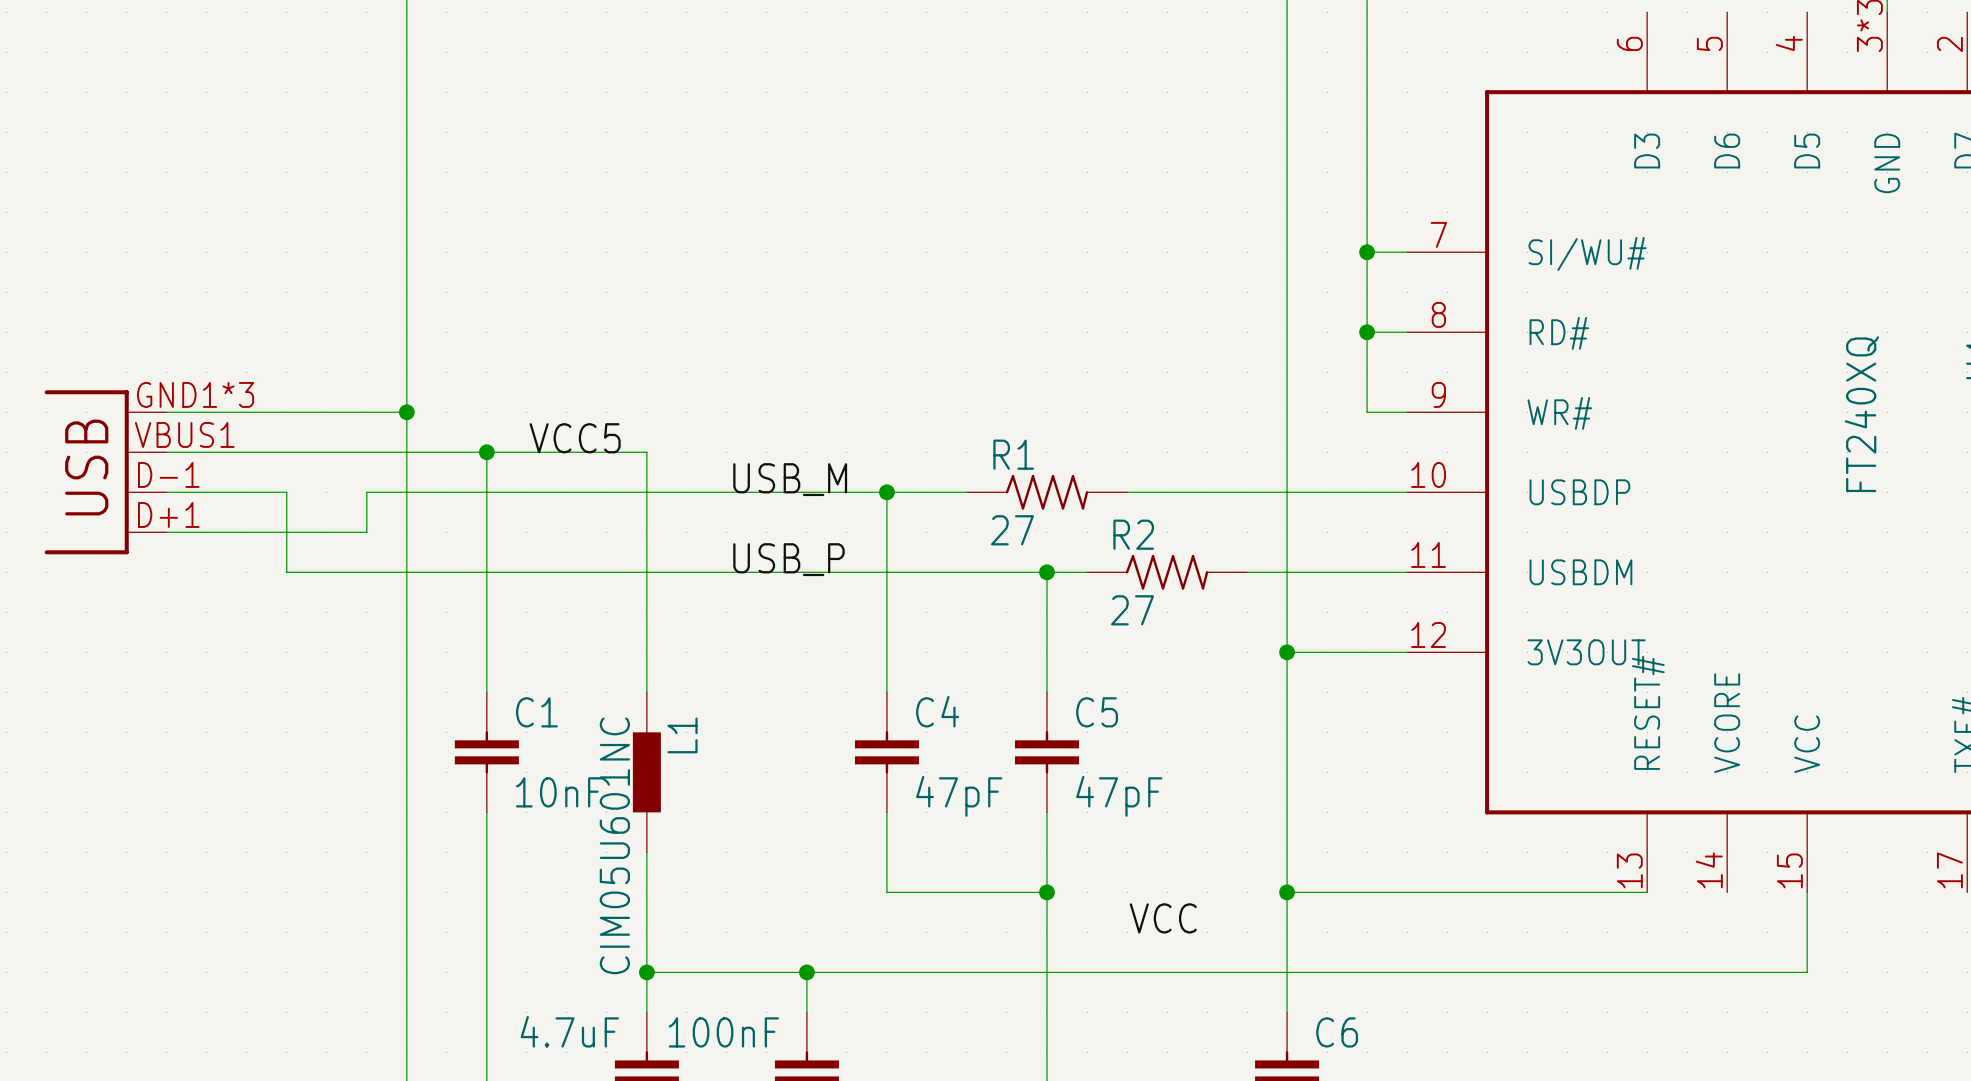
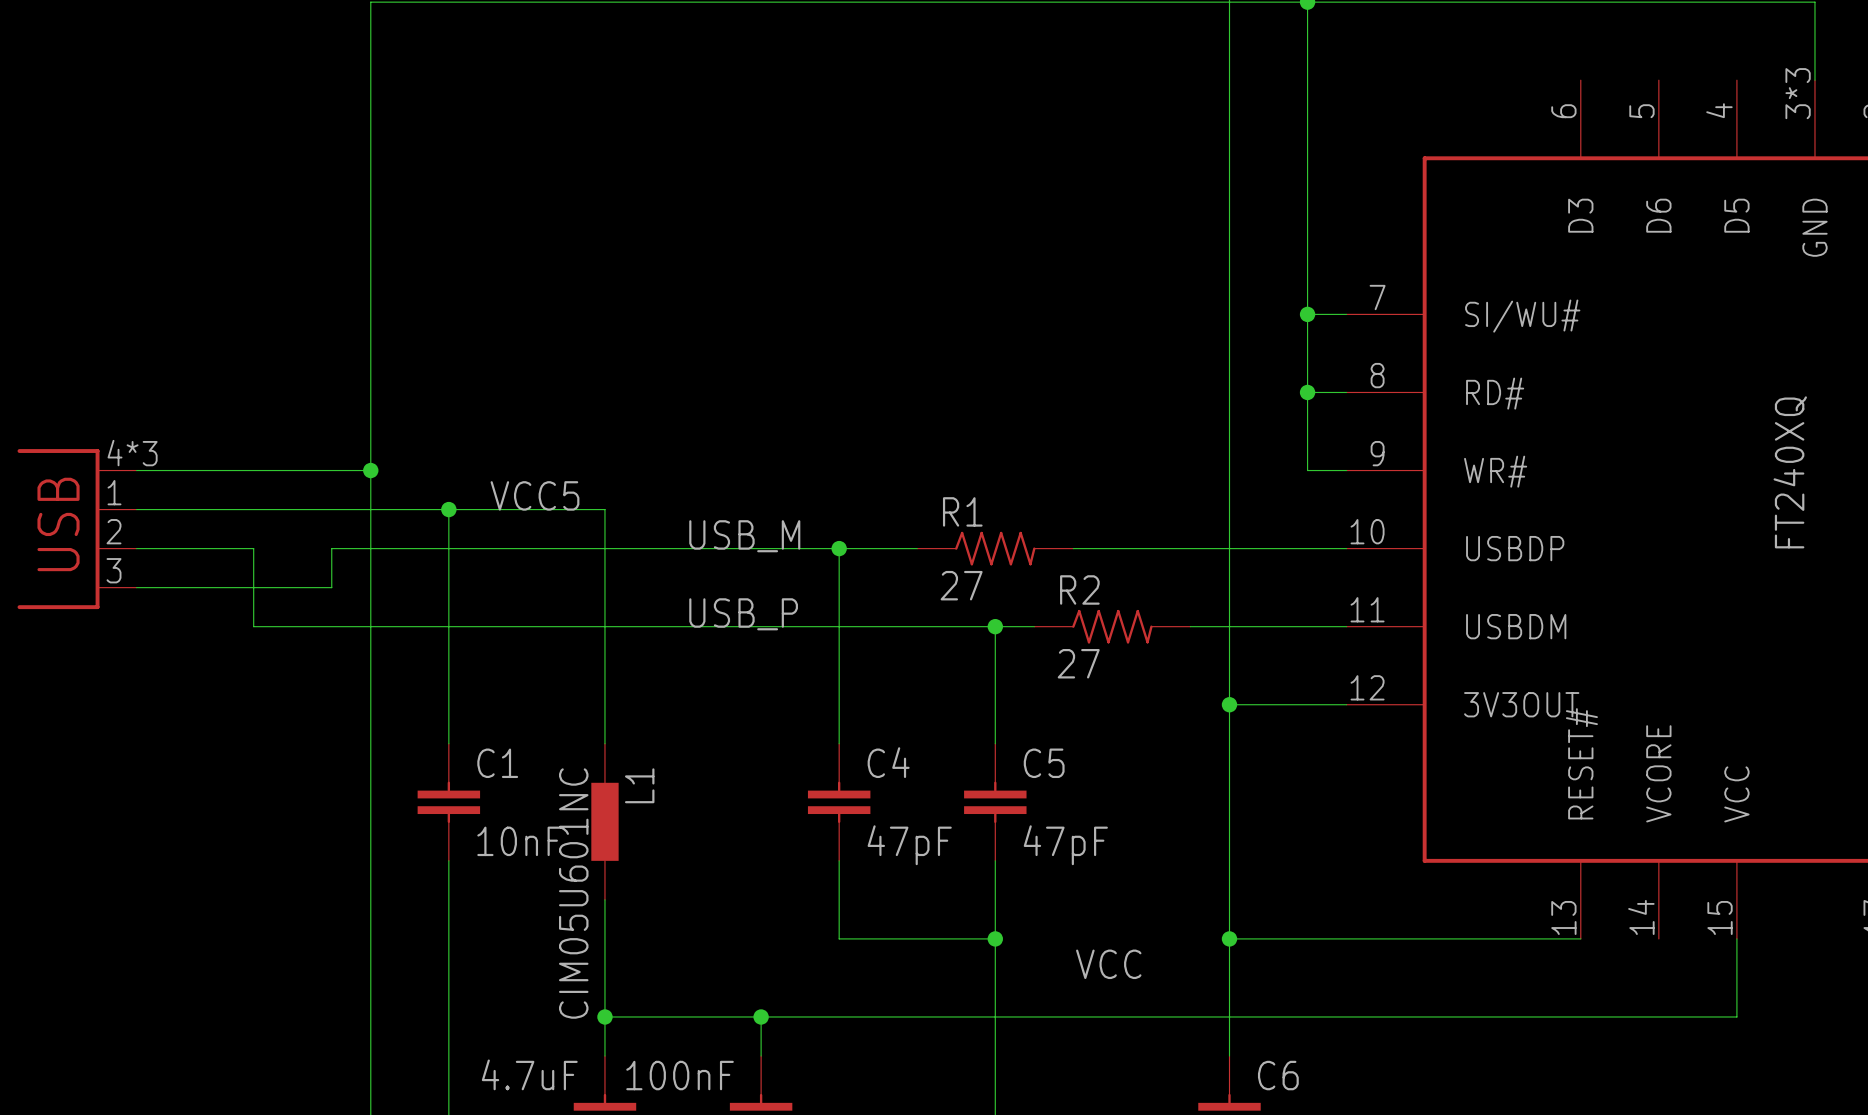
part pin number: GND1*3 (195, 394) -> 4*3 (132, 453)
part pin number: VBUS1 (184, 434) -> 1 (114, 492)
part pin number: D-1 (168, 474) -> 2 (114, 531)
part pin number: D+1 (168, 514) -> 3 (114, 570)

